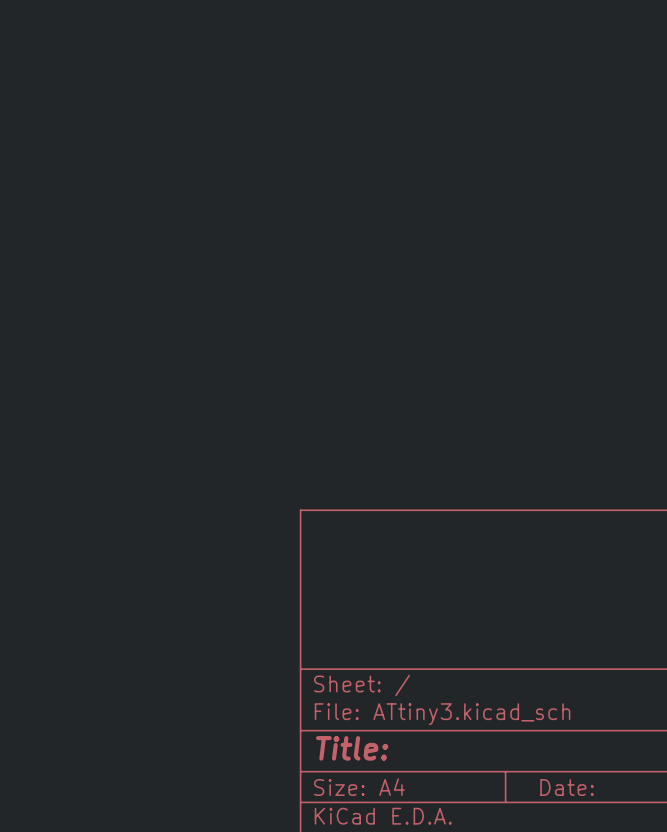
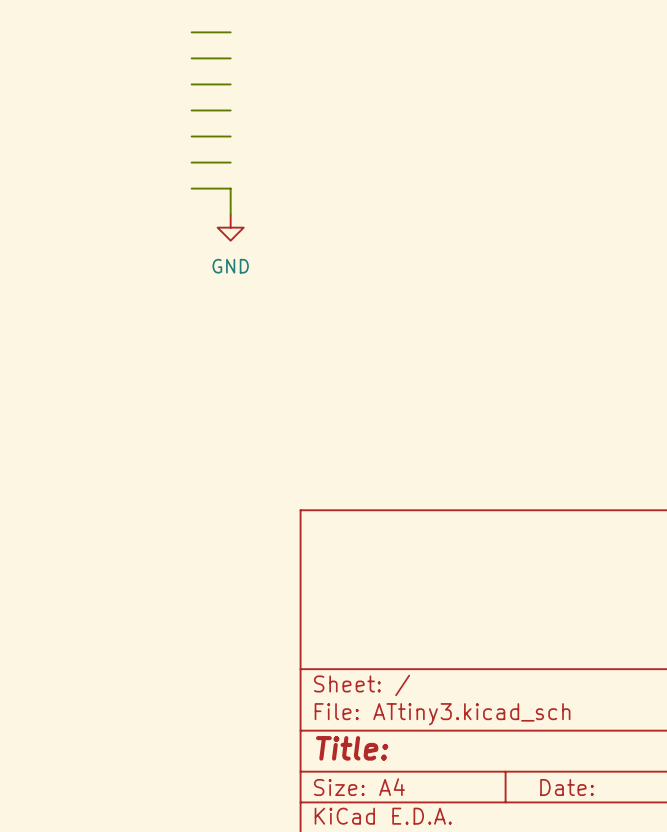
wire: none -> (191, 32) (230, 32)
wire: none -> (191, 58) (230, 58)
wire: none -> (191, 84) (230, 84)
wire: none -> (191, 110) (230, 110)
wire: none -> (191, 136) (230, 136)
wire: none -> (191, 162) (230, 162)
wire: none -> (191, 188) (230, 188) (230, 214)
power symbol: none -> GND (230, 227)

